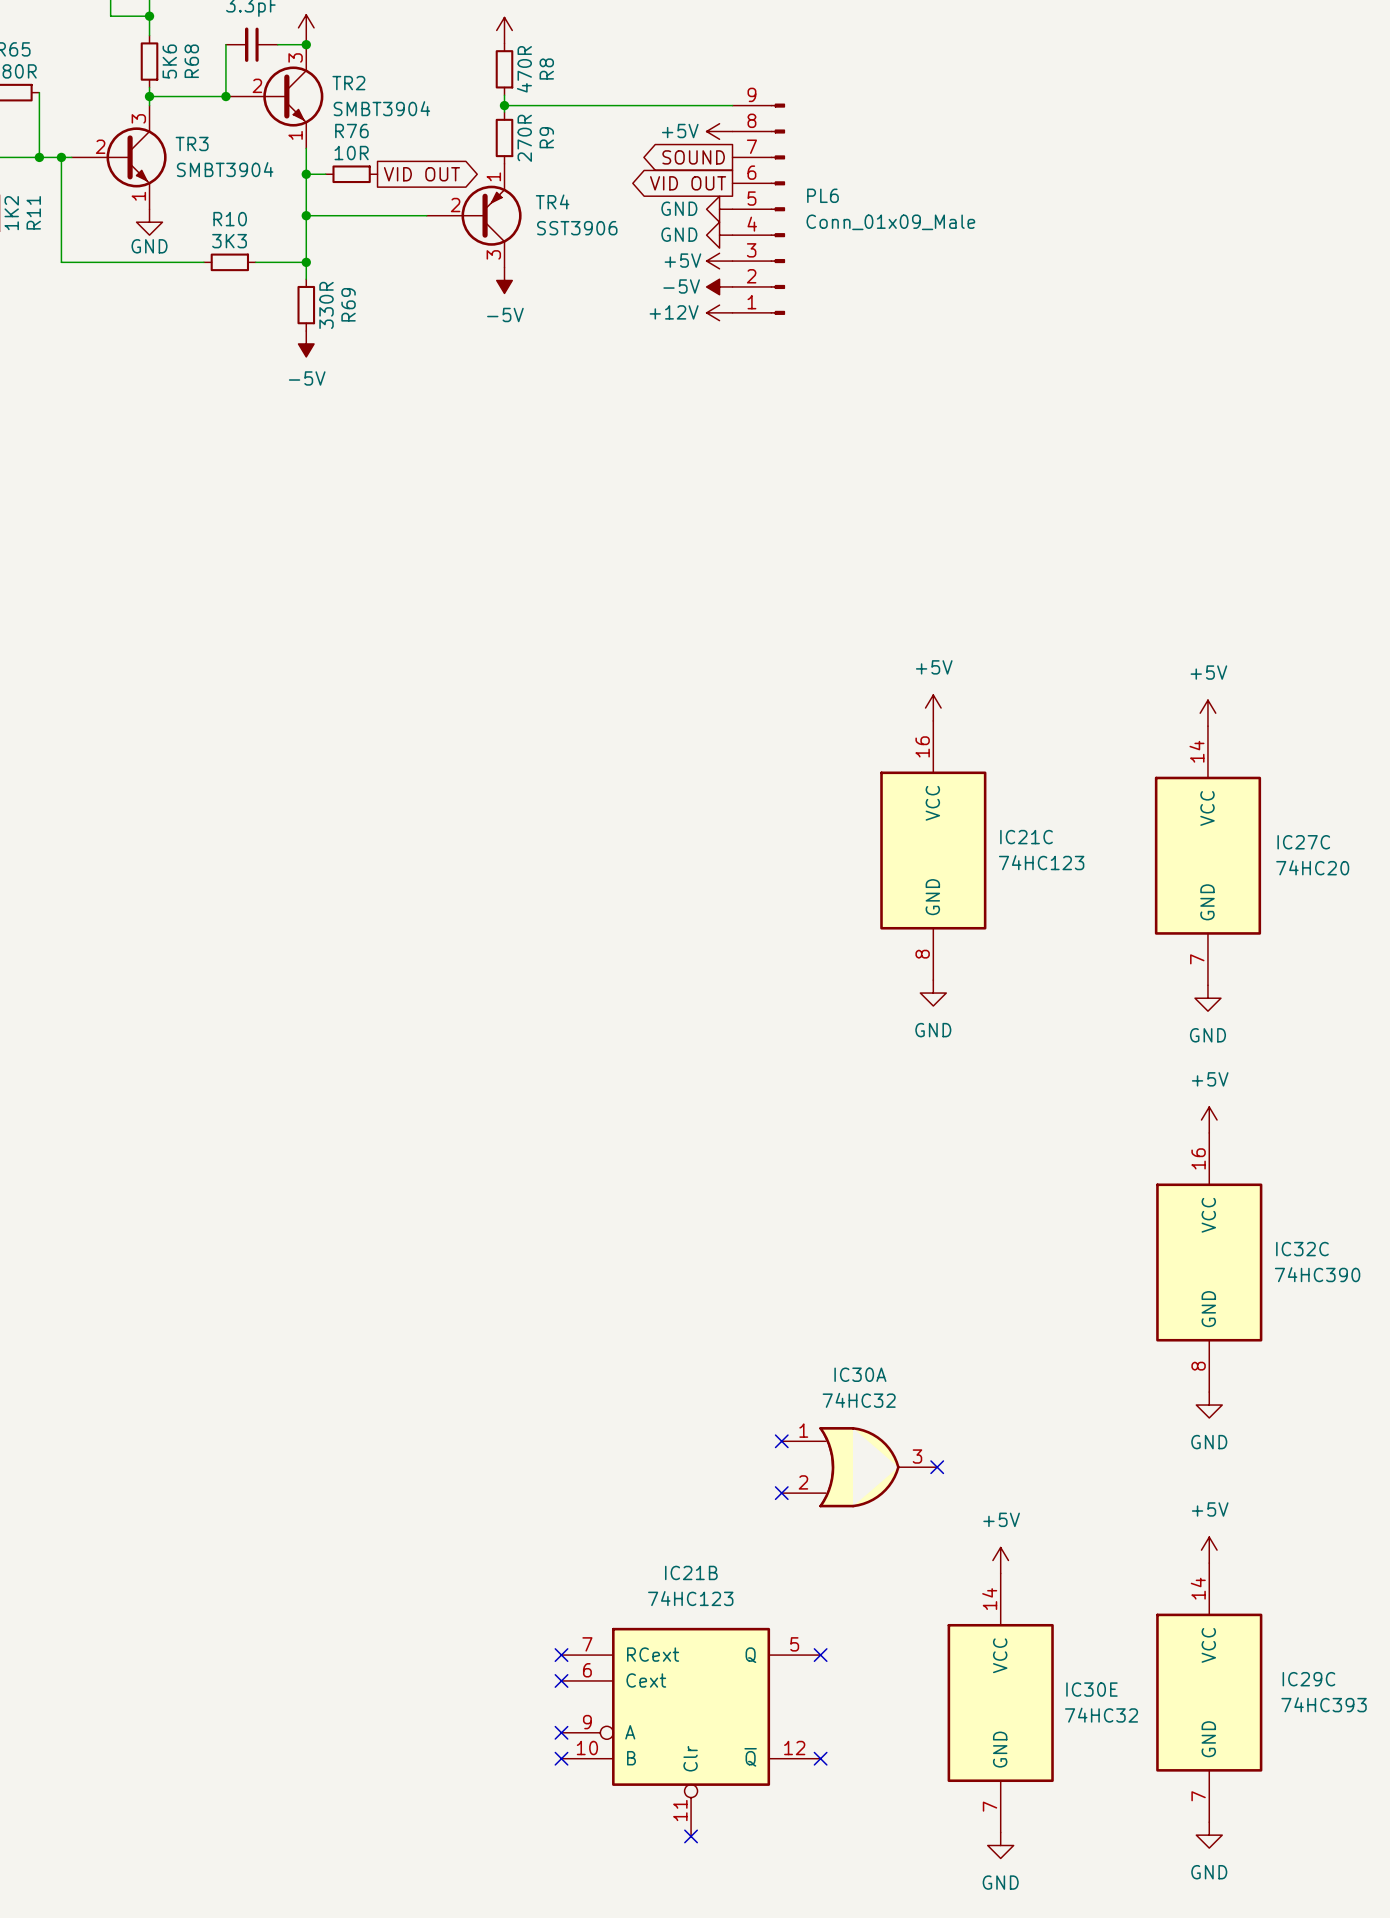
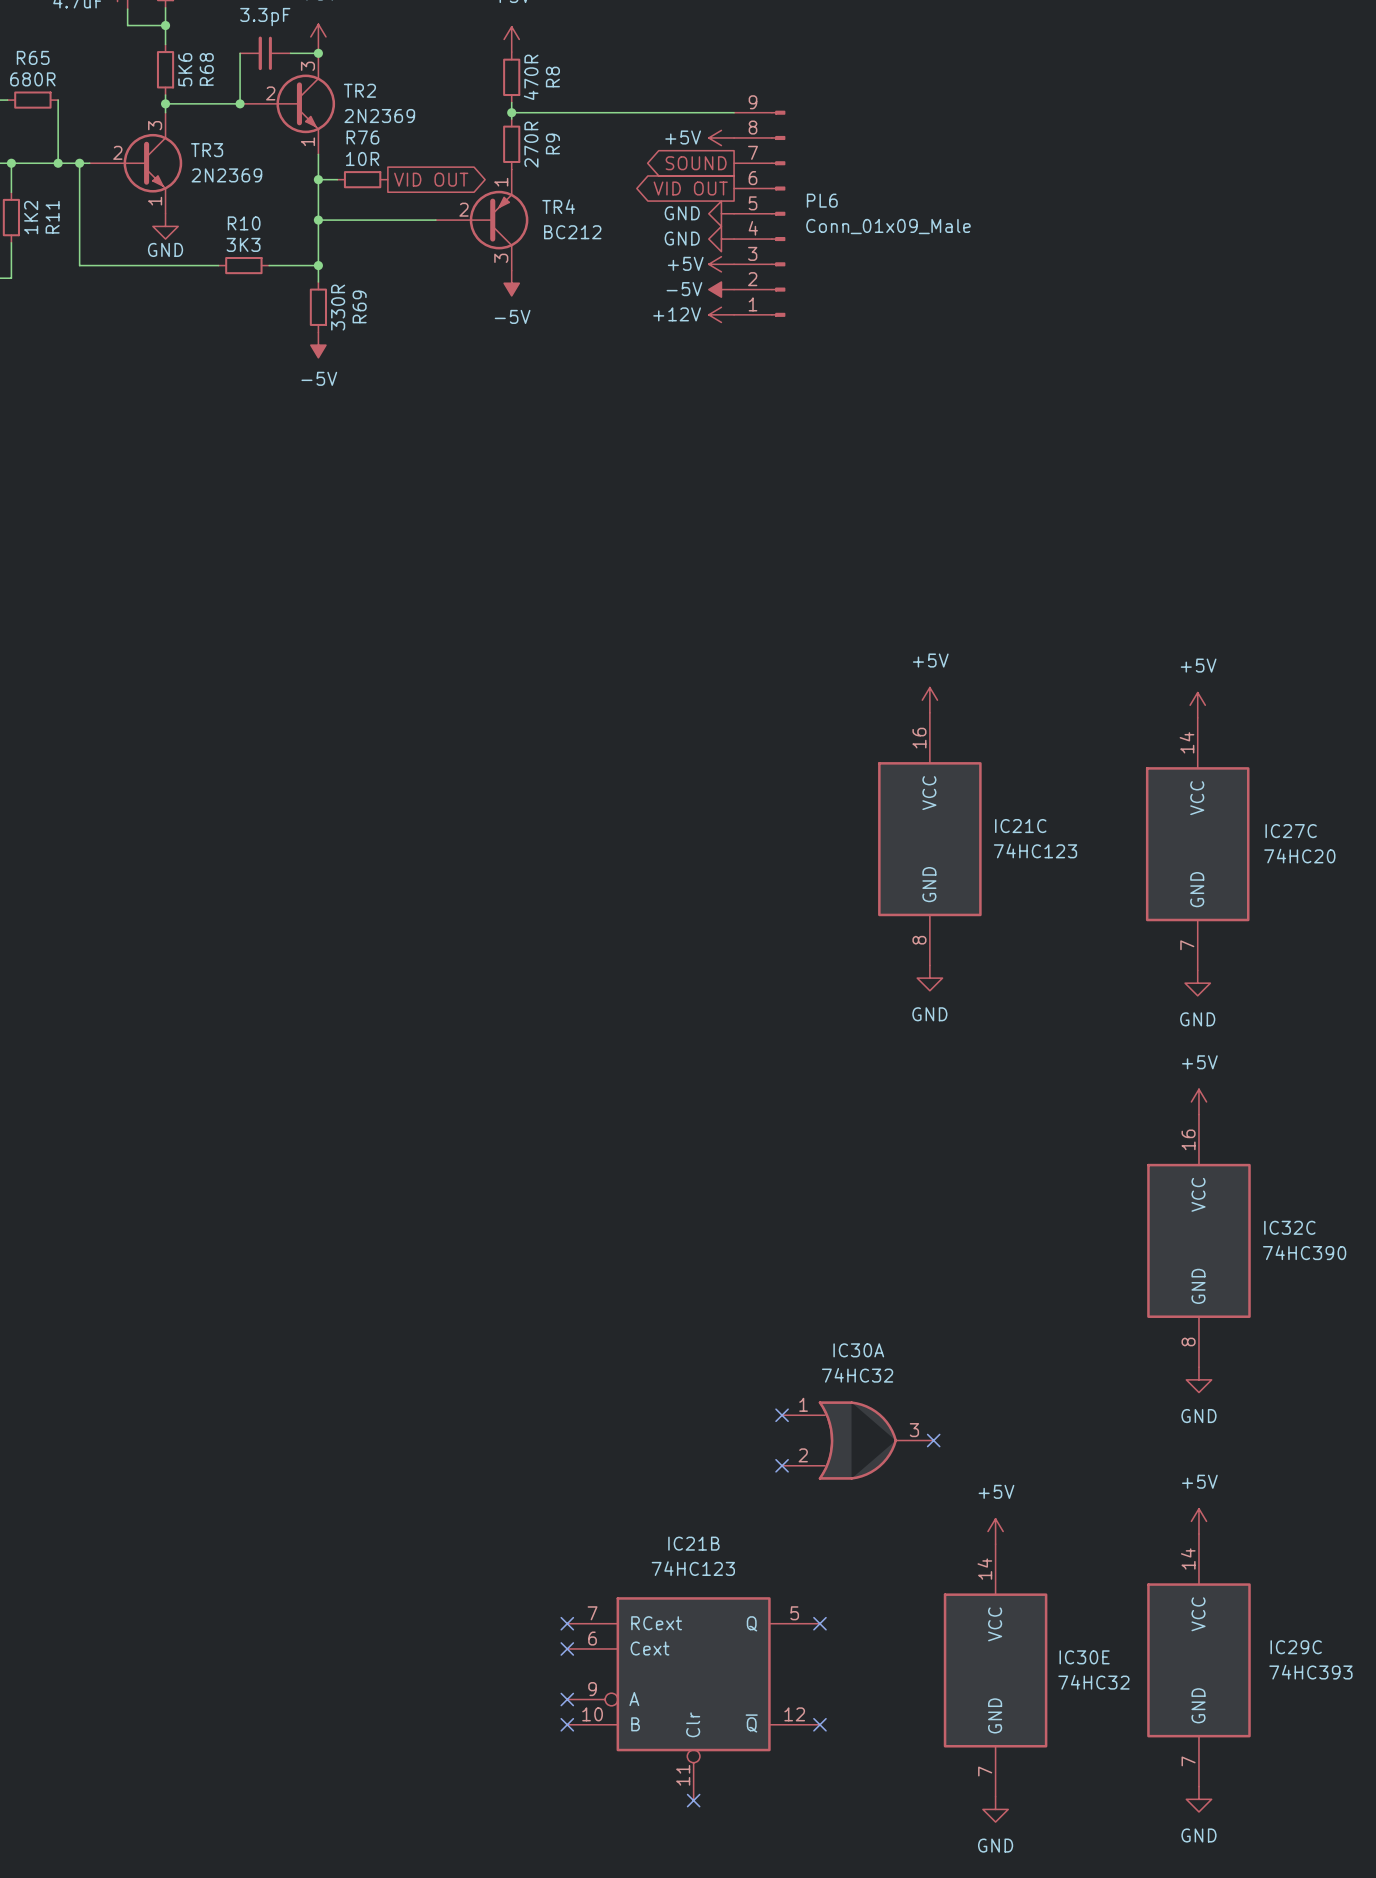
TR2 value: SMBT3904 (381, 108) -> 2N2369 (379, 116)
TR3 value: SMBT3904 (225, 169) -> 2N2369 (226, 175)
TR4 value: SST3906 (577, 228) -> BC212 (572, 232)

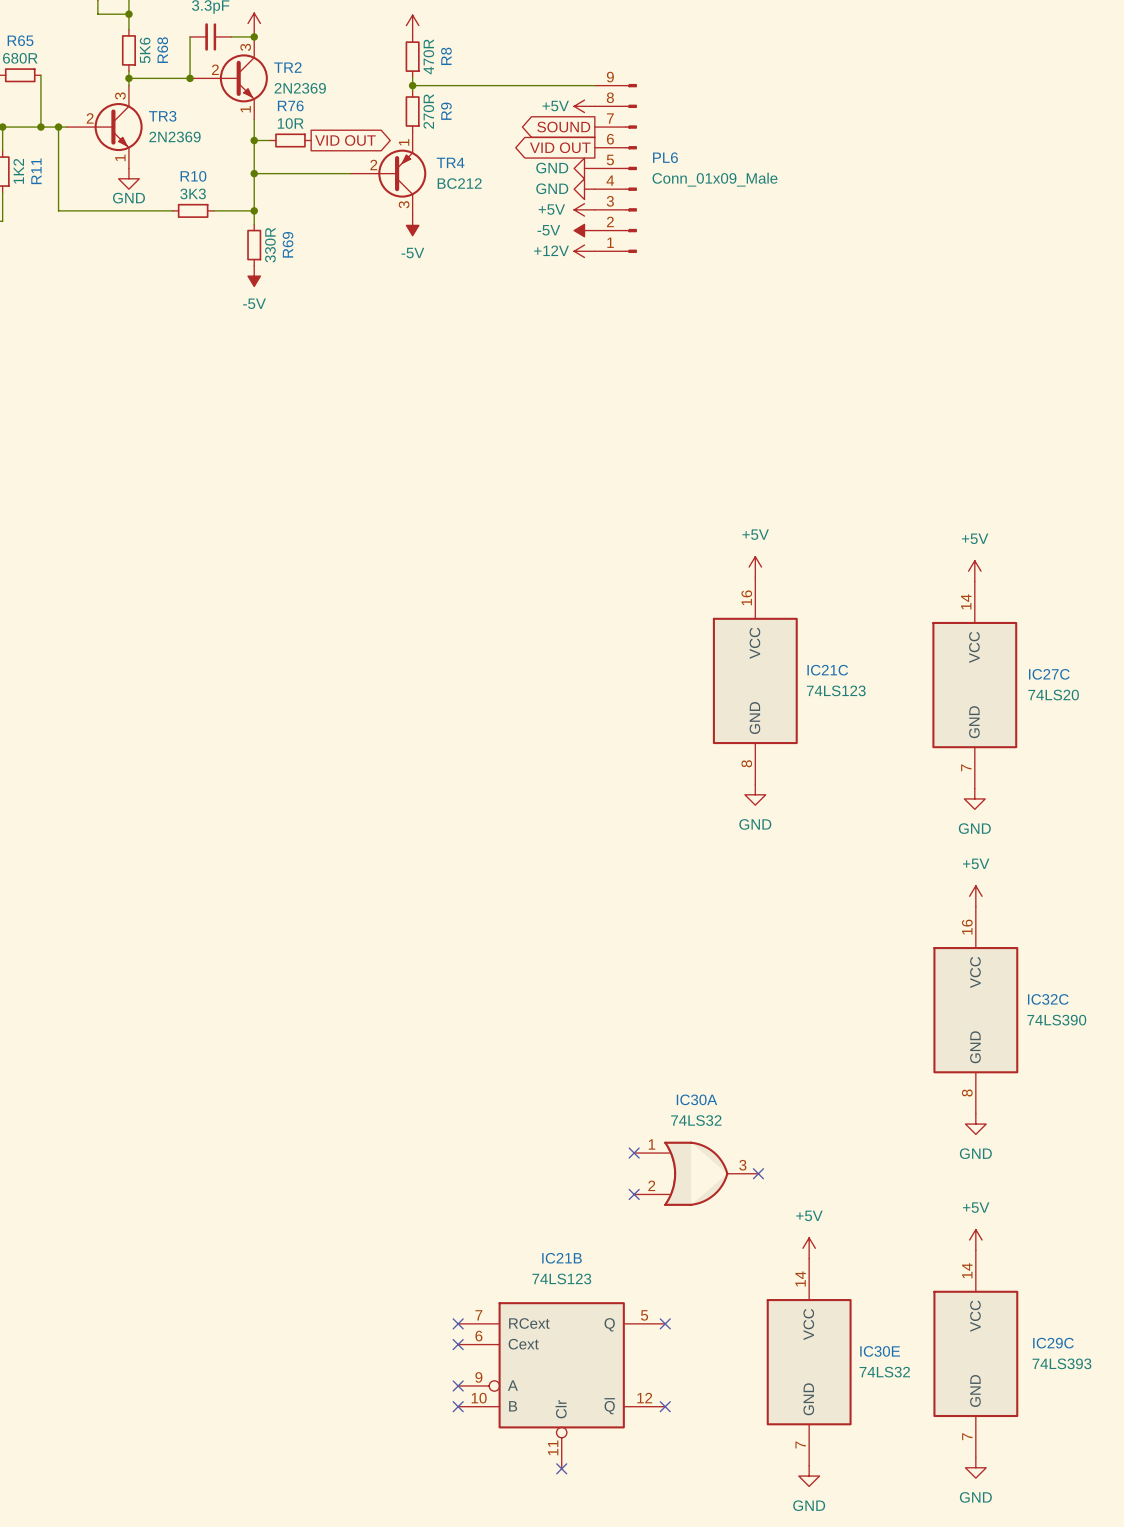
IC21C value: 74HC123 (1035, 851) -> 74LS123 (836, 690)
IC27C value: 74HC20 (1299, 856) -> 74LS20 (1053, 695)
IC32C value: 74HC390 (1304, 1252) -> 74LS390 (1056, 1020)
IC30A value: 74HC32 (857, 1375) -> 74LS32 (696, 1120)
IC21B value: 74HC123 (693, 1568) -> 74LS123 (561, 1278)
IC29C value: 74HC393 (1310, 1672) -> 74LS393 (1061, 1363)
IC30E value: 74HC32 (1093, 1682) -> 74LS32 (884, 1372)

